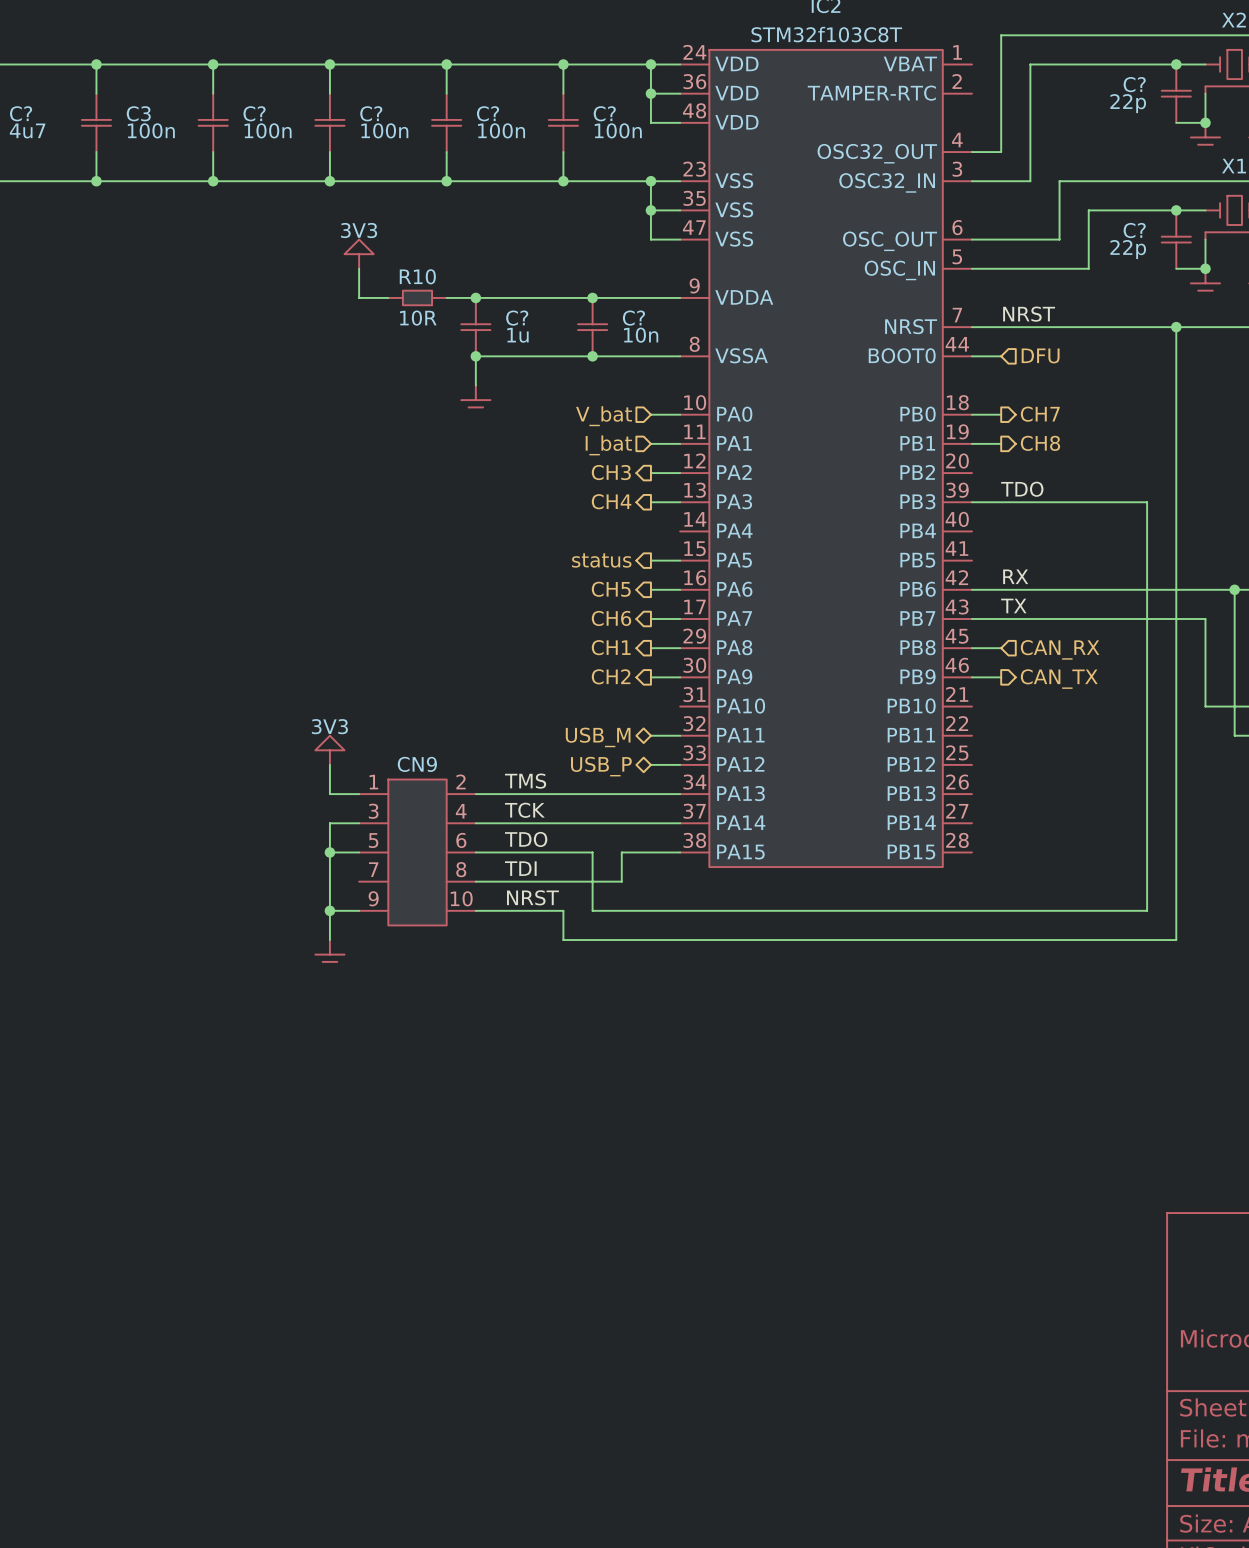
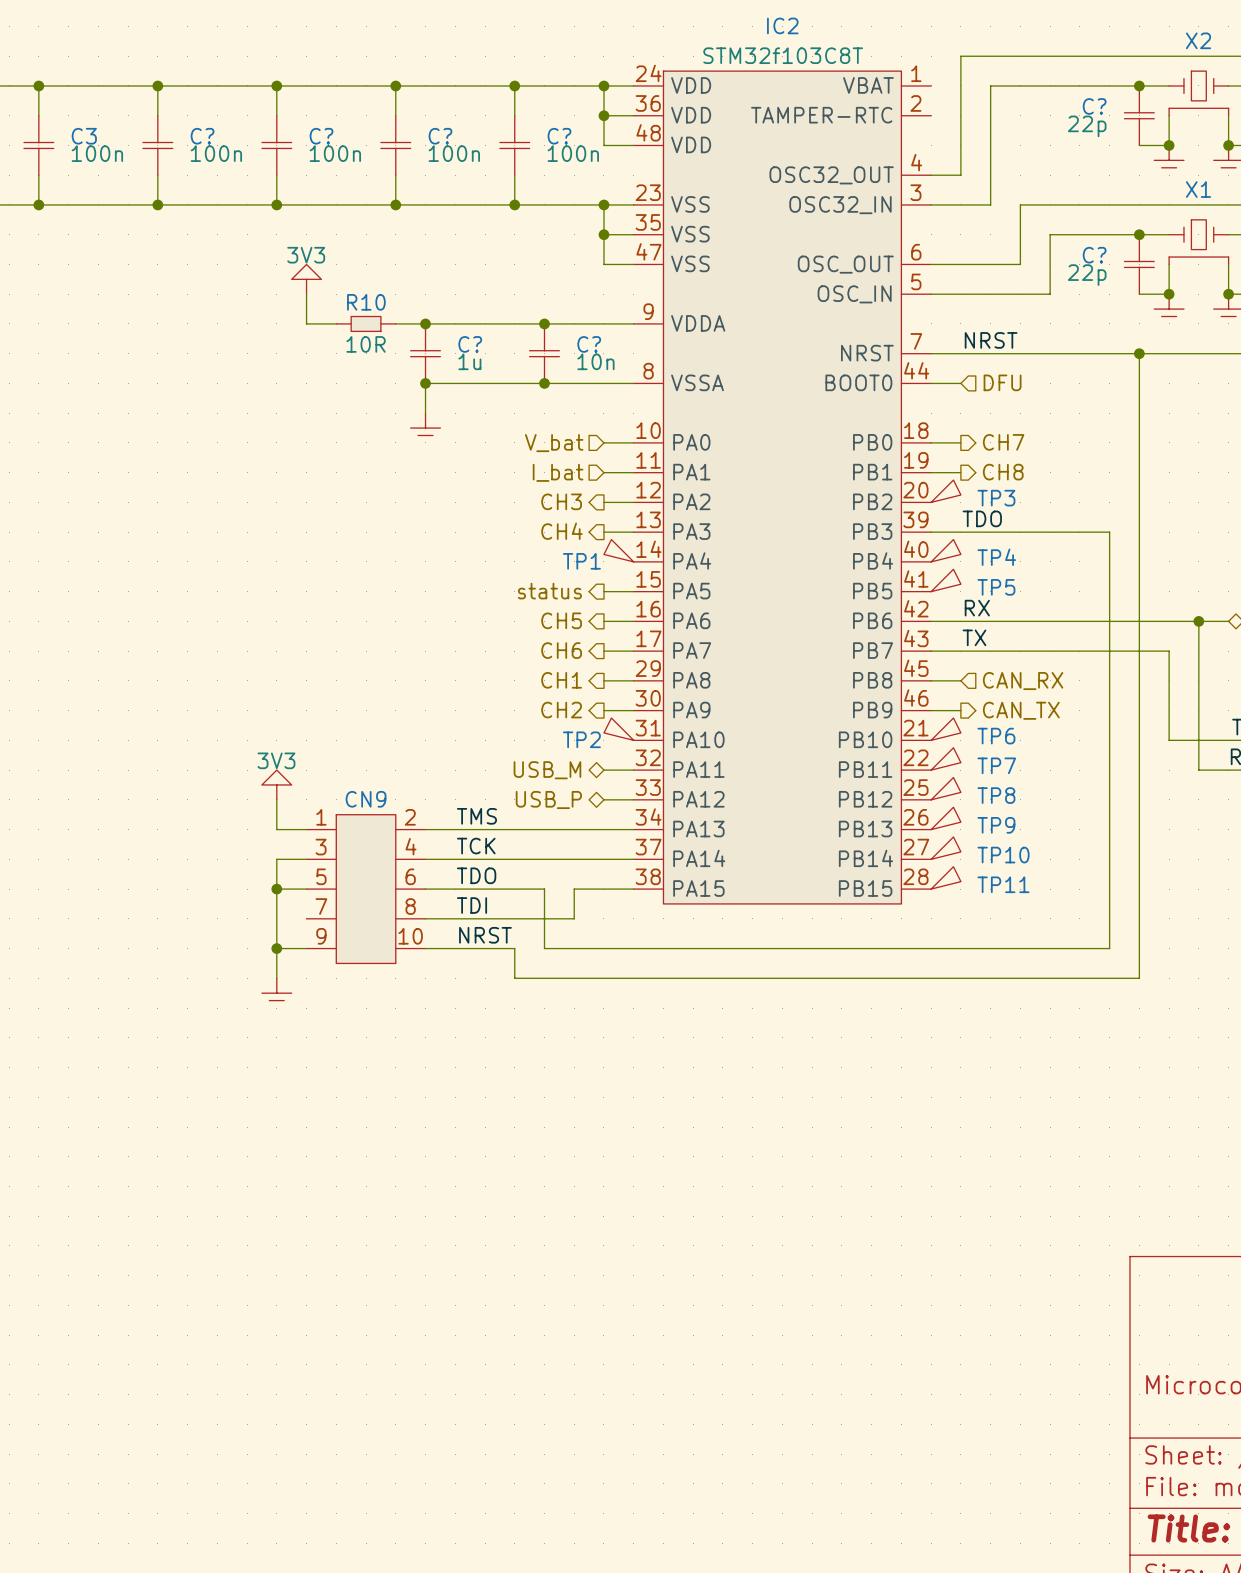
TP3: none -> (946, 491)
TP1: none -> (618, 550)
TP4: none -> (946, 550)
TP5: none -> (946, 580)
TP2: none -> (618, 729)
TP6: none -> (946, 729)
TP7: none -> (946, 758)
TP8: none -> (946, 788)
TP9: none -> (946, 818)
TP10: none -> (946, 848)
TP11: none -> (946, 877)

